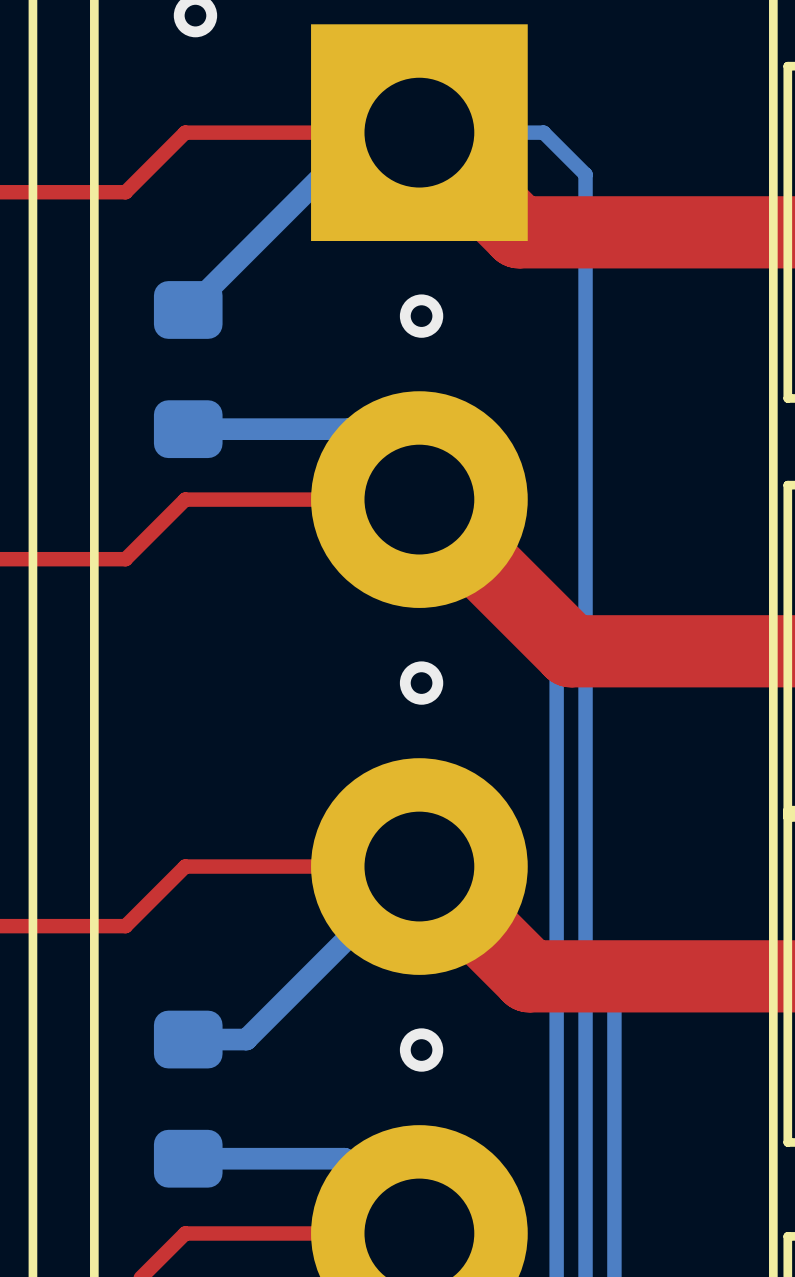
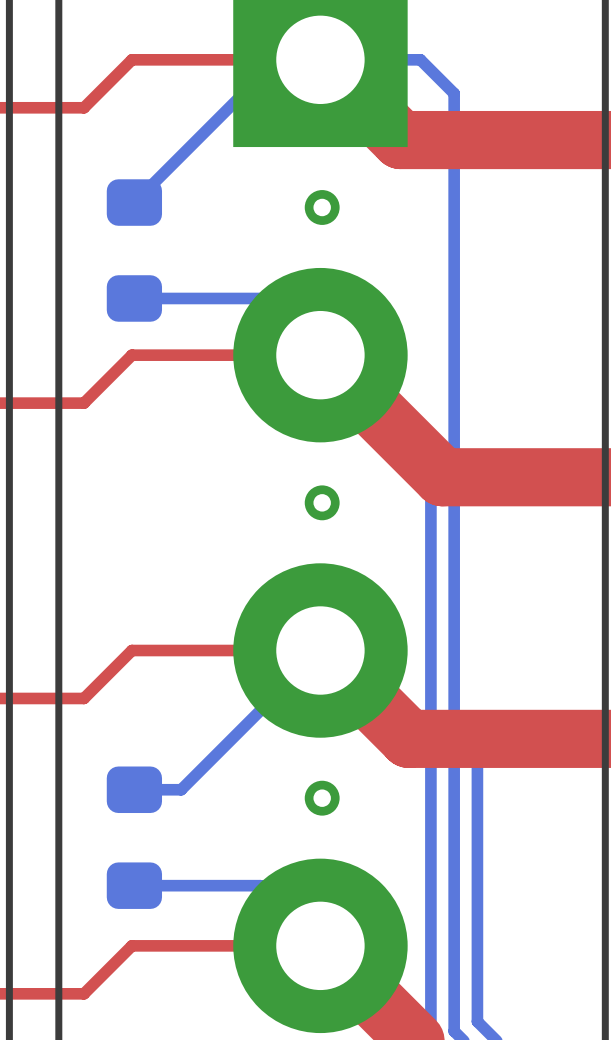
bottom track width: thick (419, 132) (365, 132) (188, 309) -> thin (320, 59) (277, 59) (134, 202)
bottom track width: thick (188, 429) (348, 429) (419, 499) -> thin (134, 298) (263, 298) (320, 355)
bottom track width: thick (419, 866) (246, 1039) (188, 1039) -> thin (320, 650) (181, 789) (134, 789)
bottom track width: thick (188, 1158) (344, 1158) (419, 1233) -> thin (134, 885) (260, 885) (320, 945)

